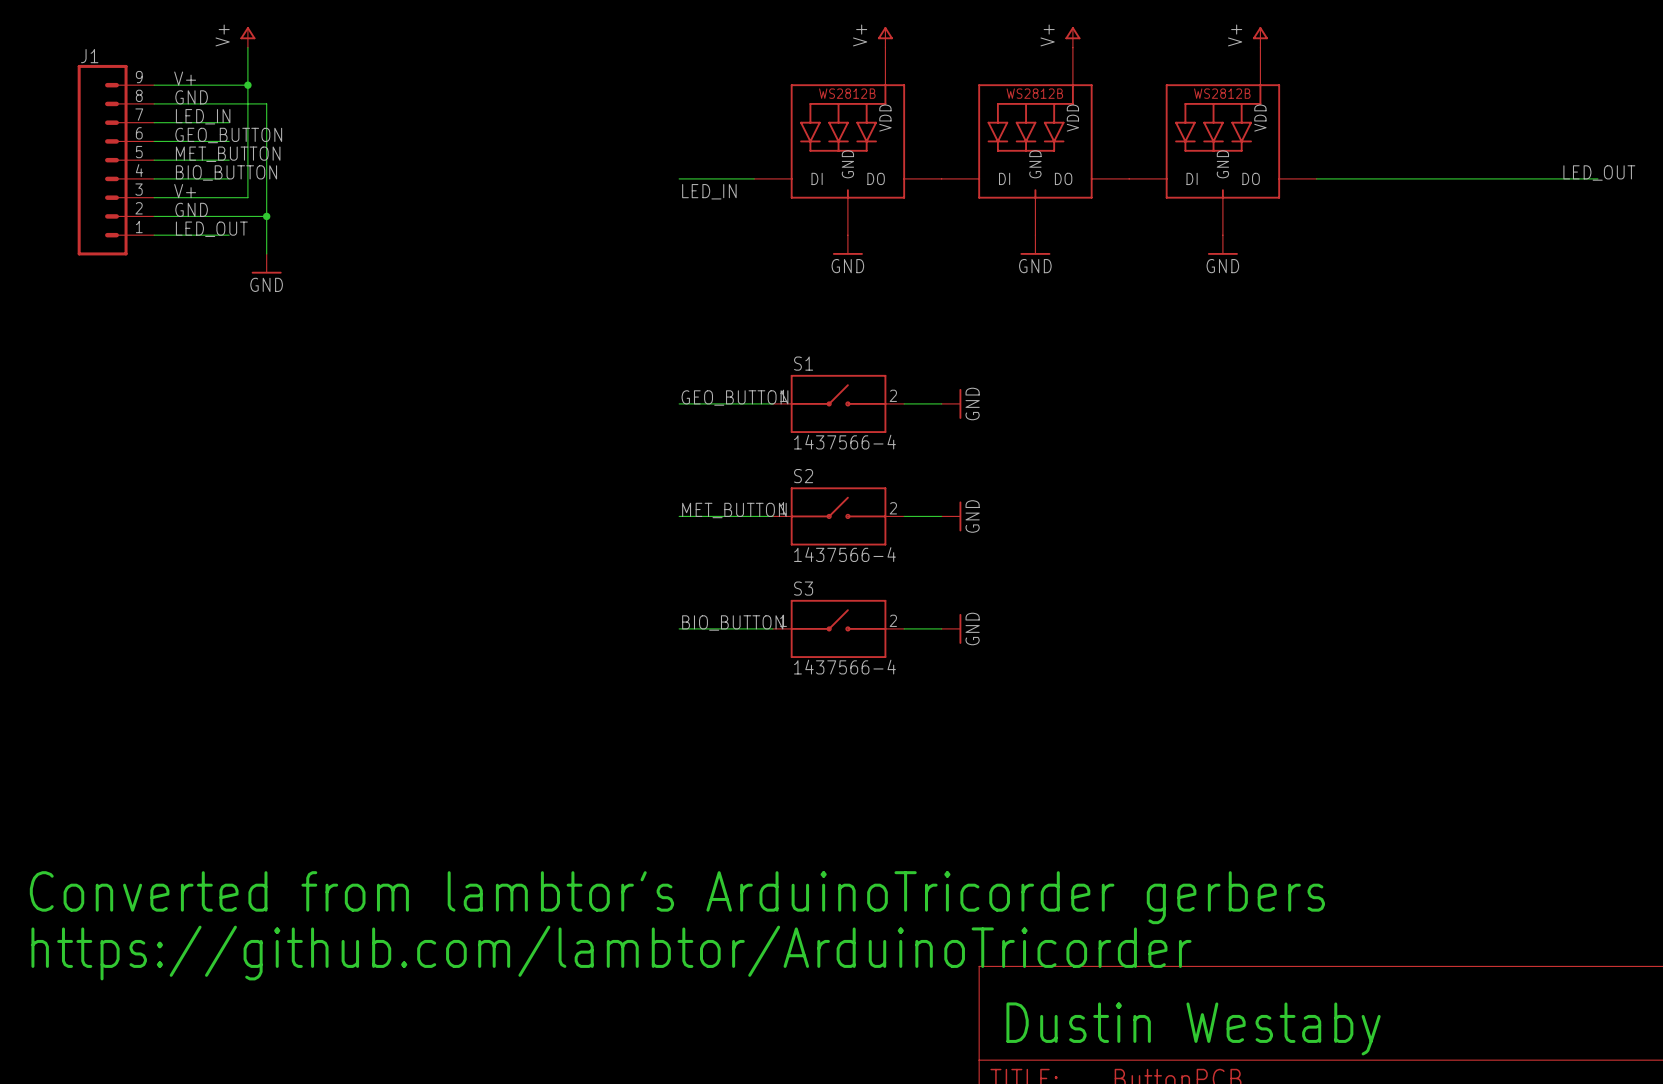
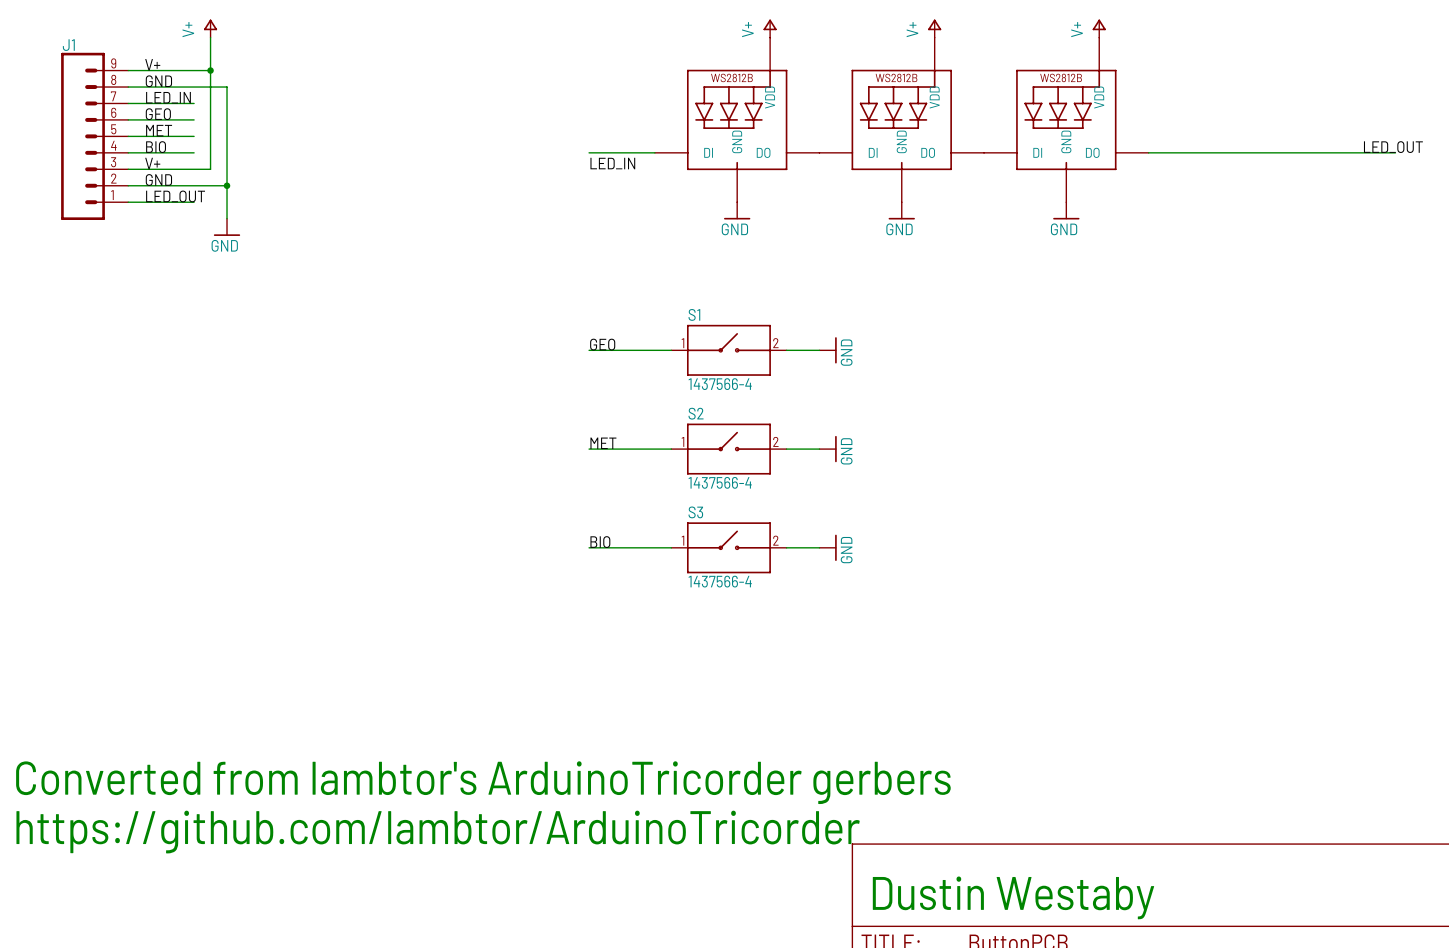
label: GEO_BUTTON (228, 135) -> GEO (158, 114)
label: MET_BUTTON (228, 154) -> MET (159, 130)
label: BIO_BUTTON (226, 172) -> BIO (156, 147)
label: GEO_BUTTON (734, 397) -> GEO (602, 344)
label: MET_BUTTON (734, 510) -> MET (603, 443)
label: BIO_BUTTON (732, 622) -> BIO (600, 542)

